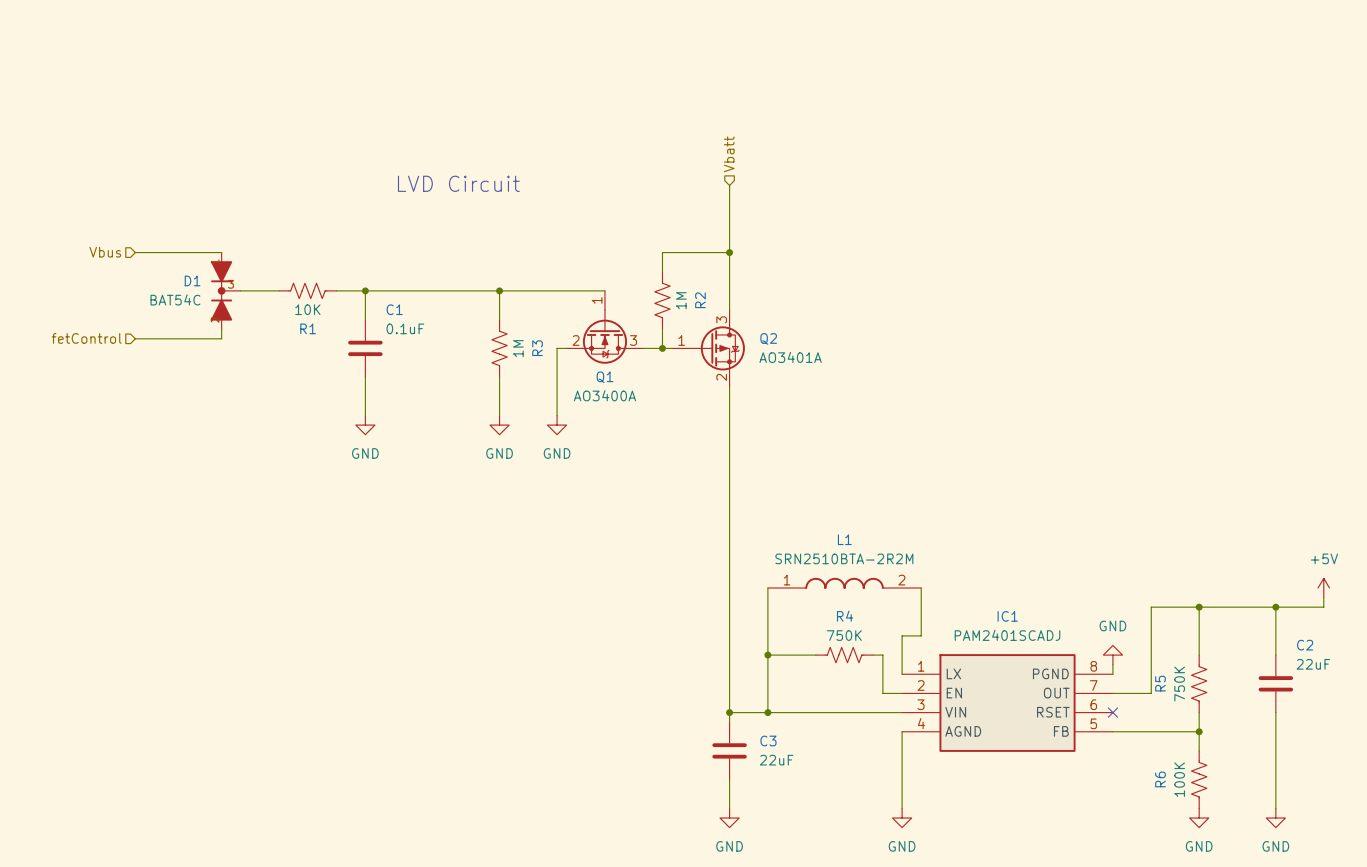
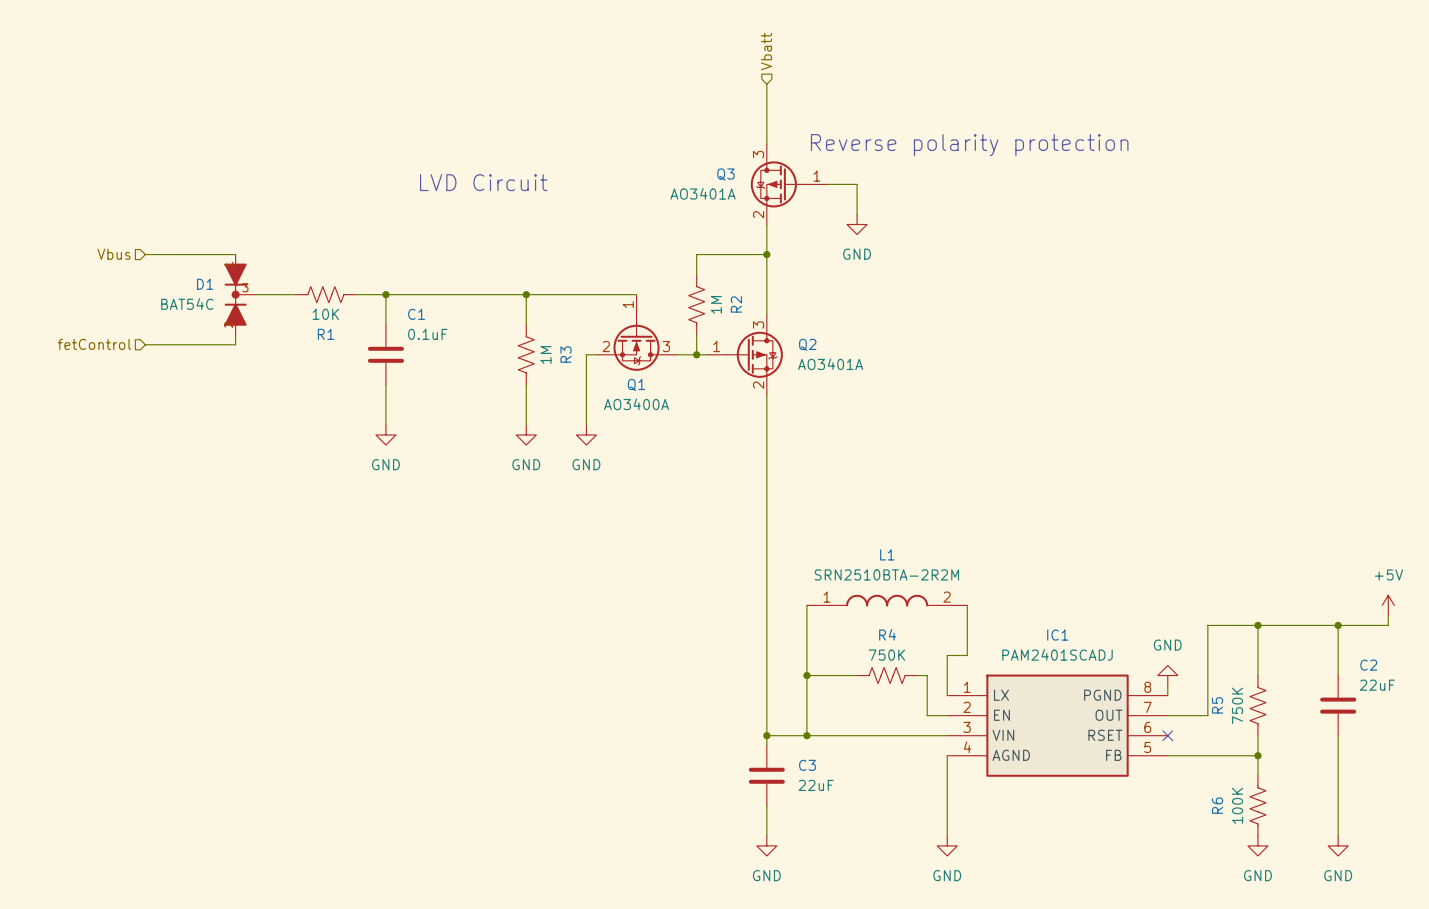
wire: none -> (766, 84) (766, 144)
text: none -> Reverse polarity protection (969, 145)
hierarchical label position: Vbatt (729, 154) -> Vbatt (766, 51)
Q3: none -> AO3401A (788, 184)
wire: none -> (826, 184) (857, 184) (857, 214)
power symbol: none -> GND (857, 224)

